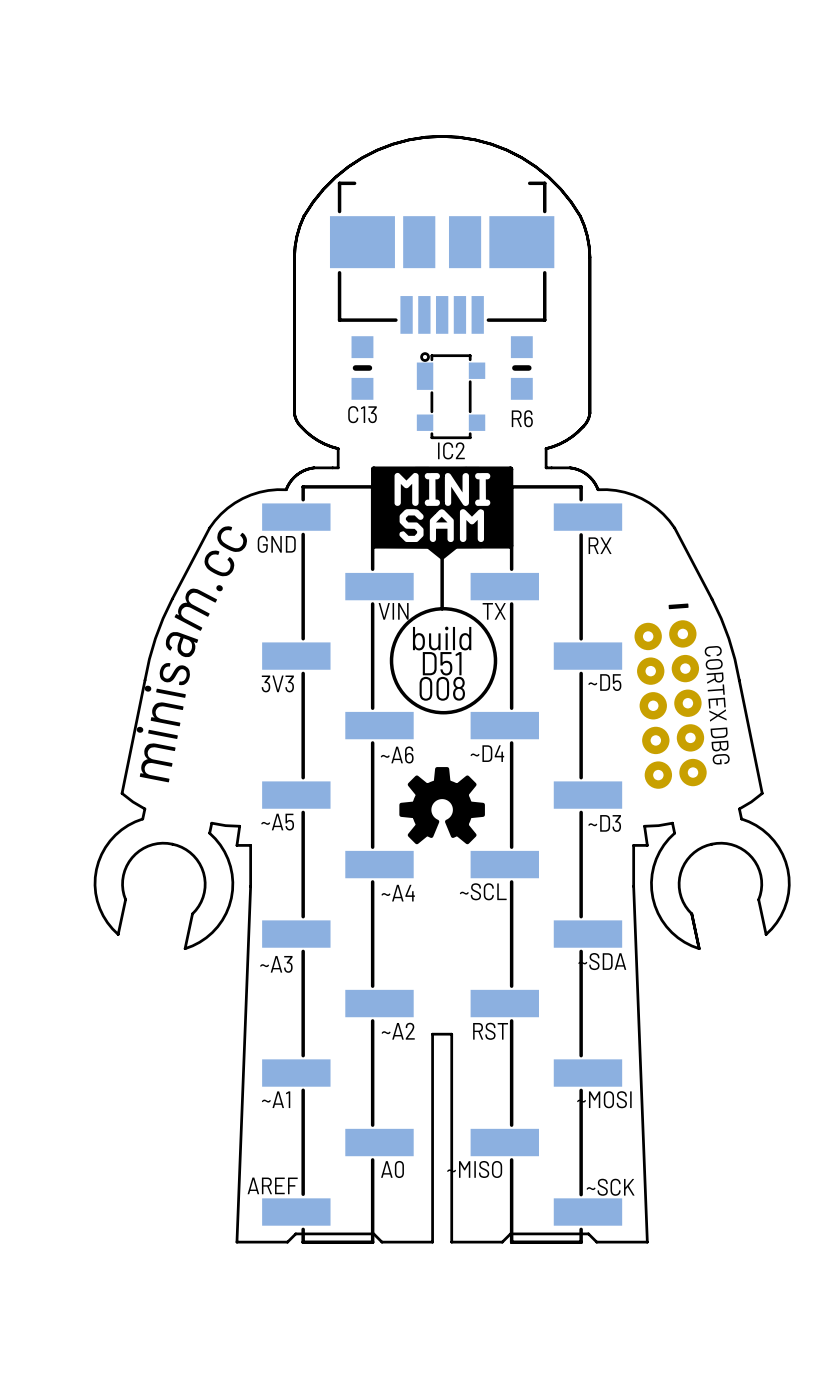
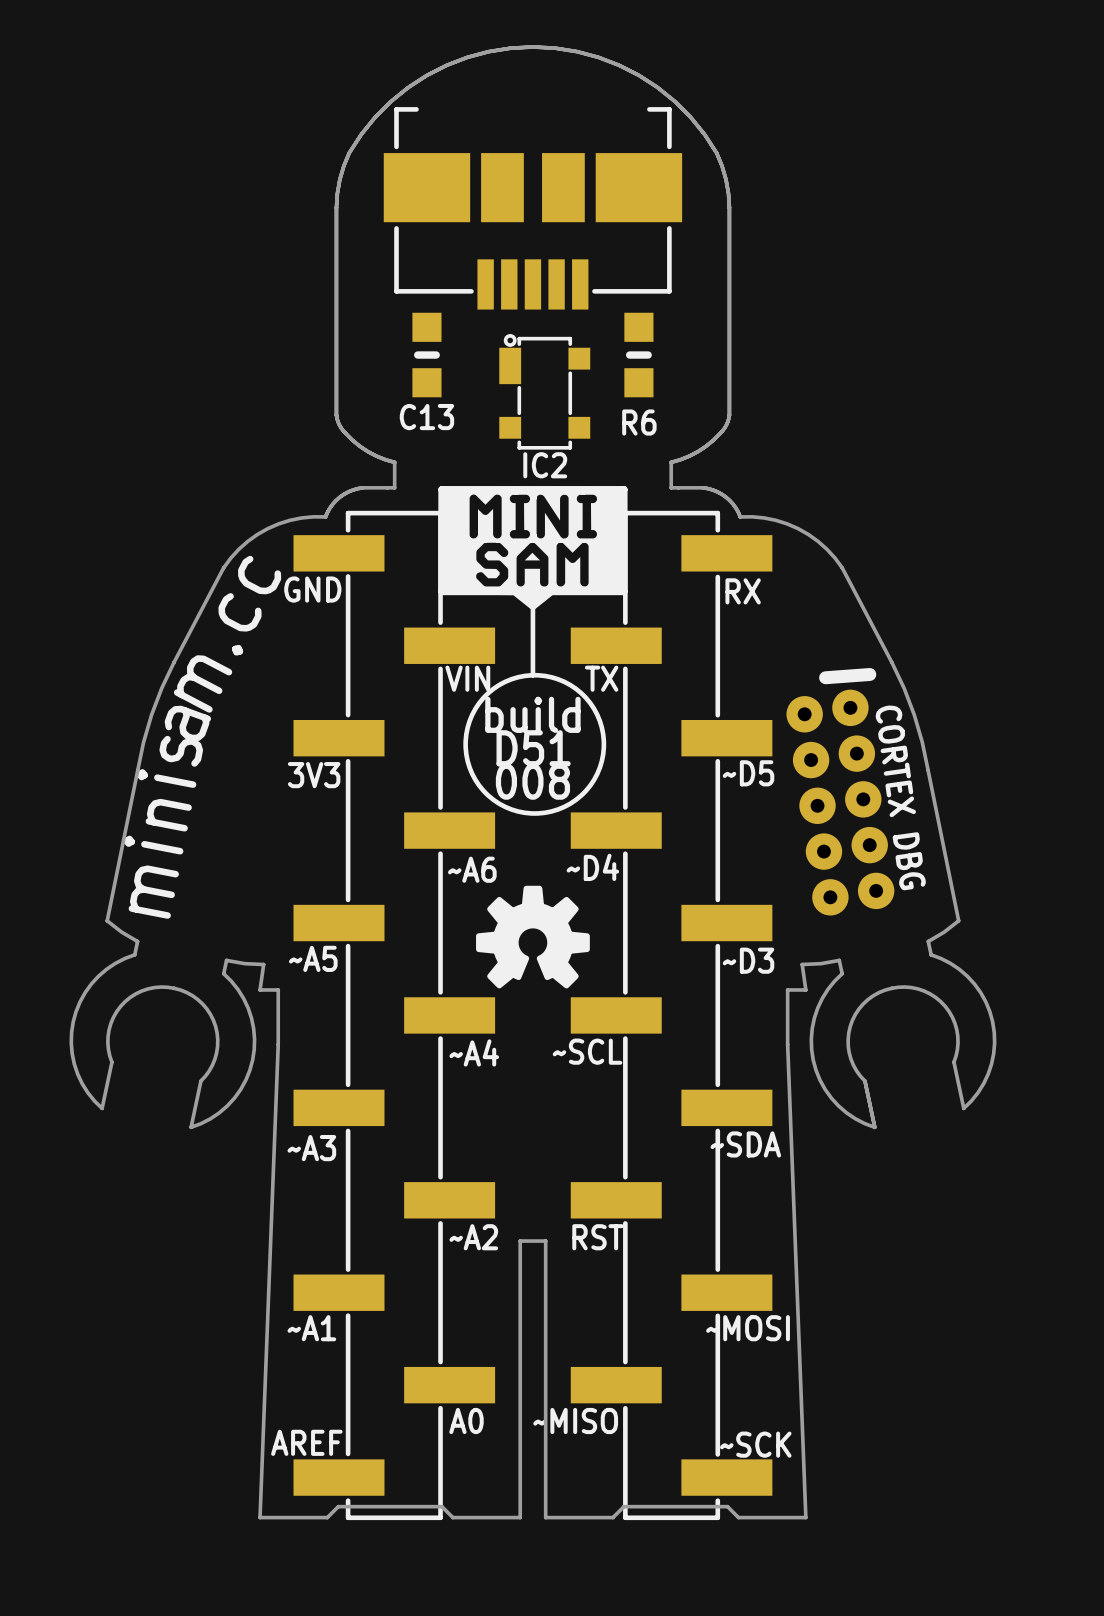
part rotation: 0° (670, 704) -> 3.8° counterclockwise (840, 802)
text rotation: 0° (717, 705) -> 3.8° counterclockwise (900, 797)

